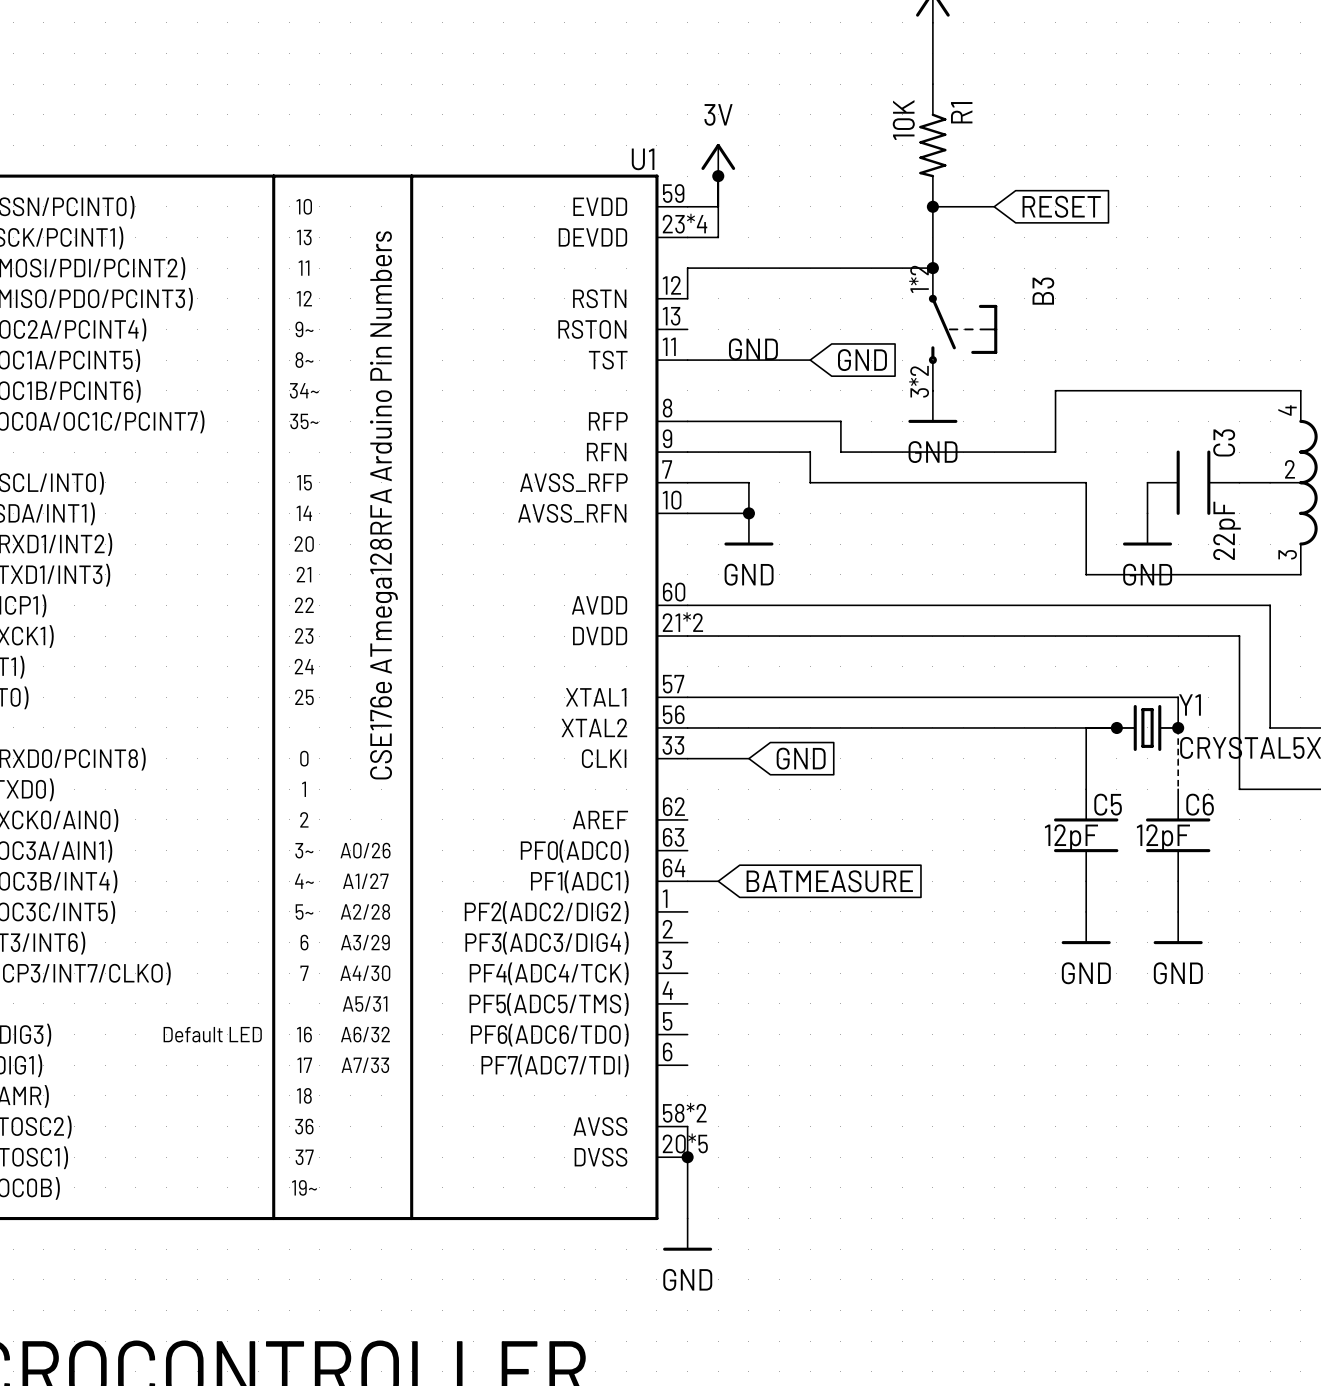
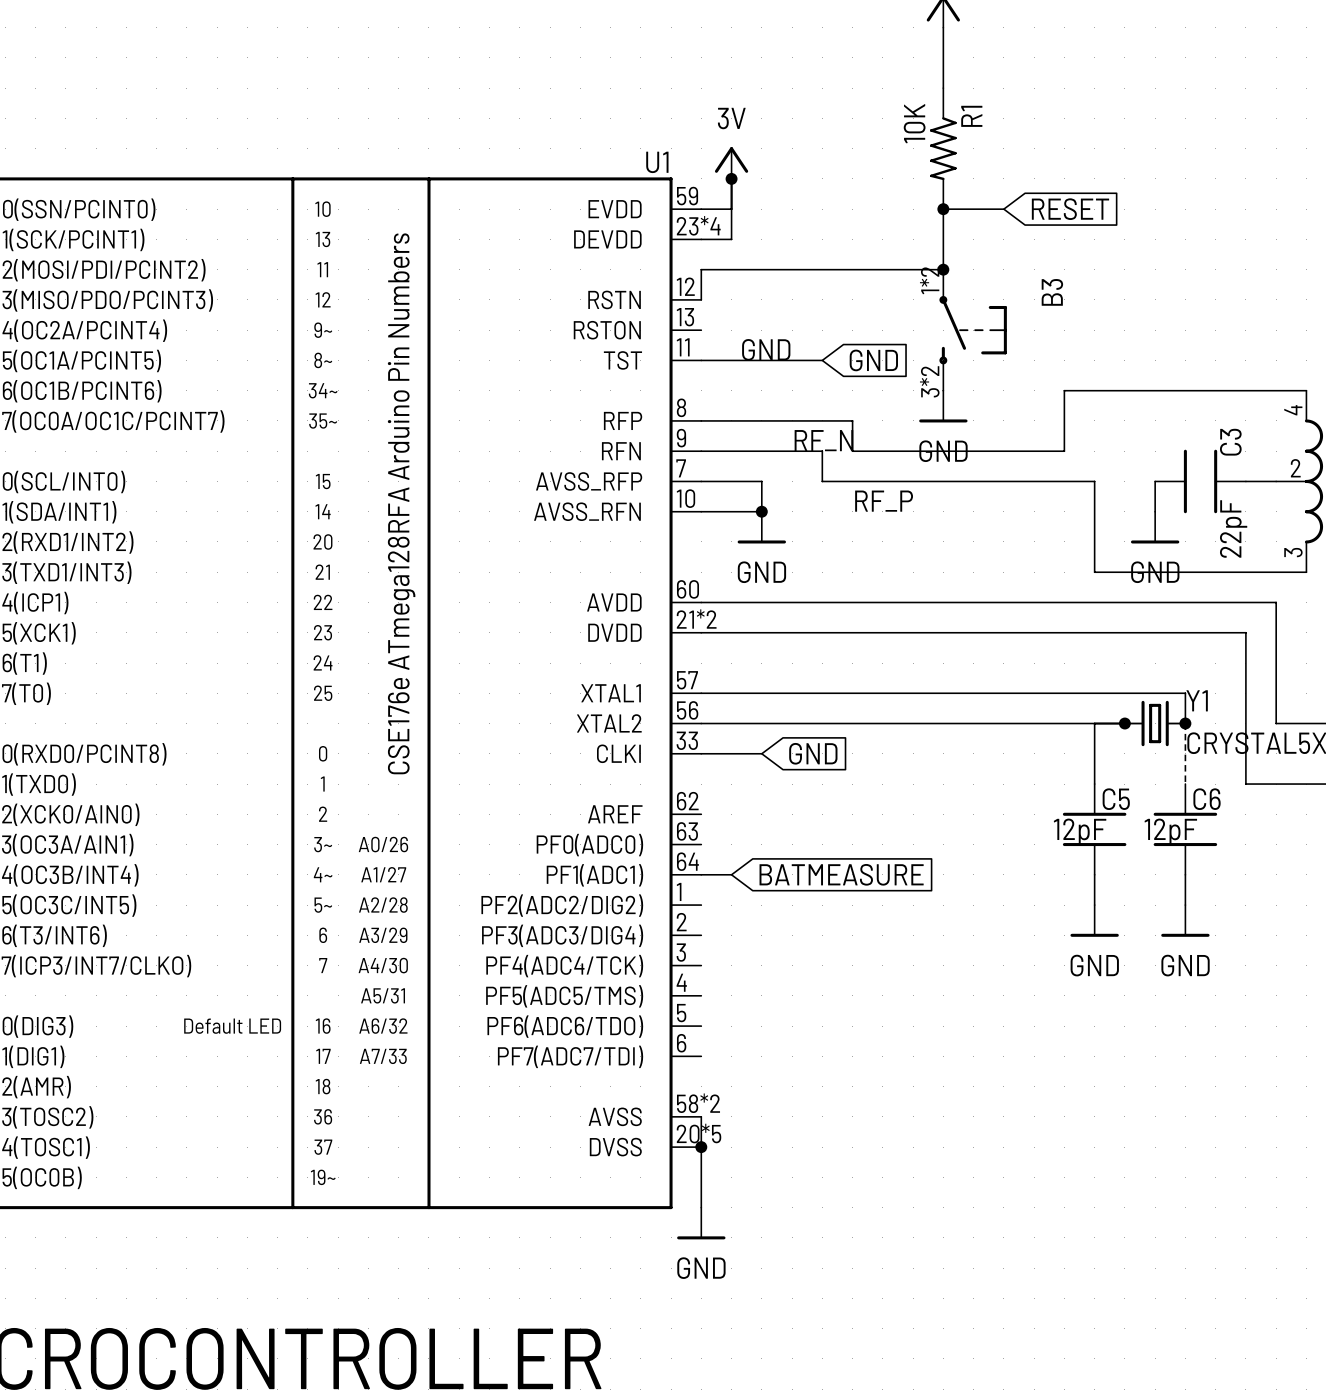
label: none -> RF_N (823, 440)
label: none -> RF_P (884, 501)

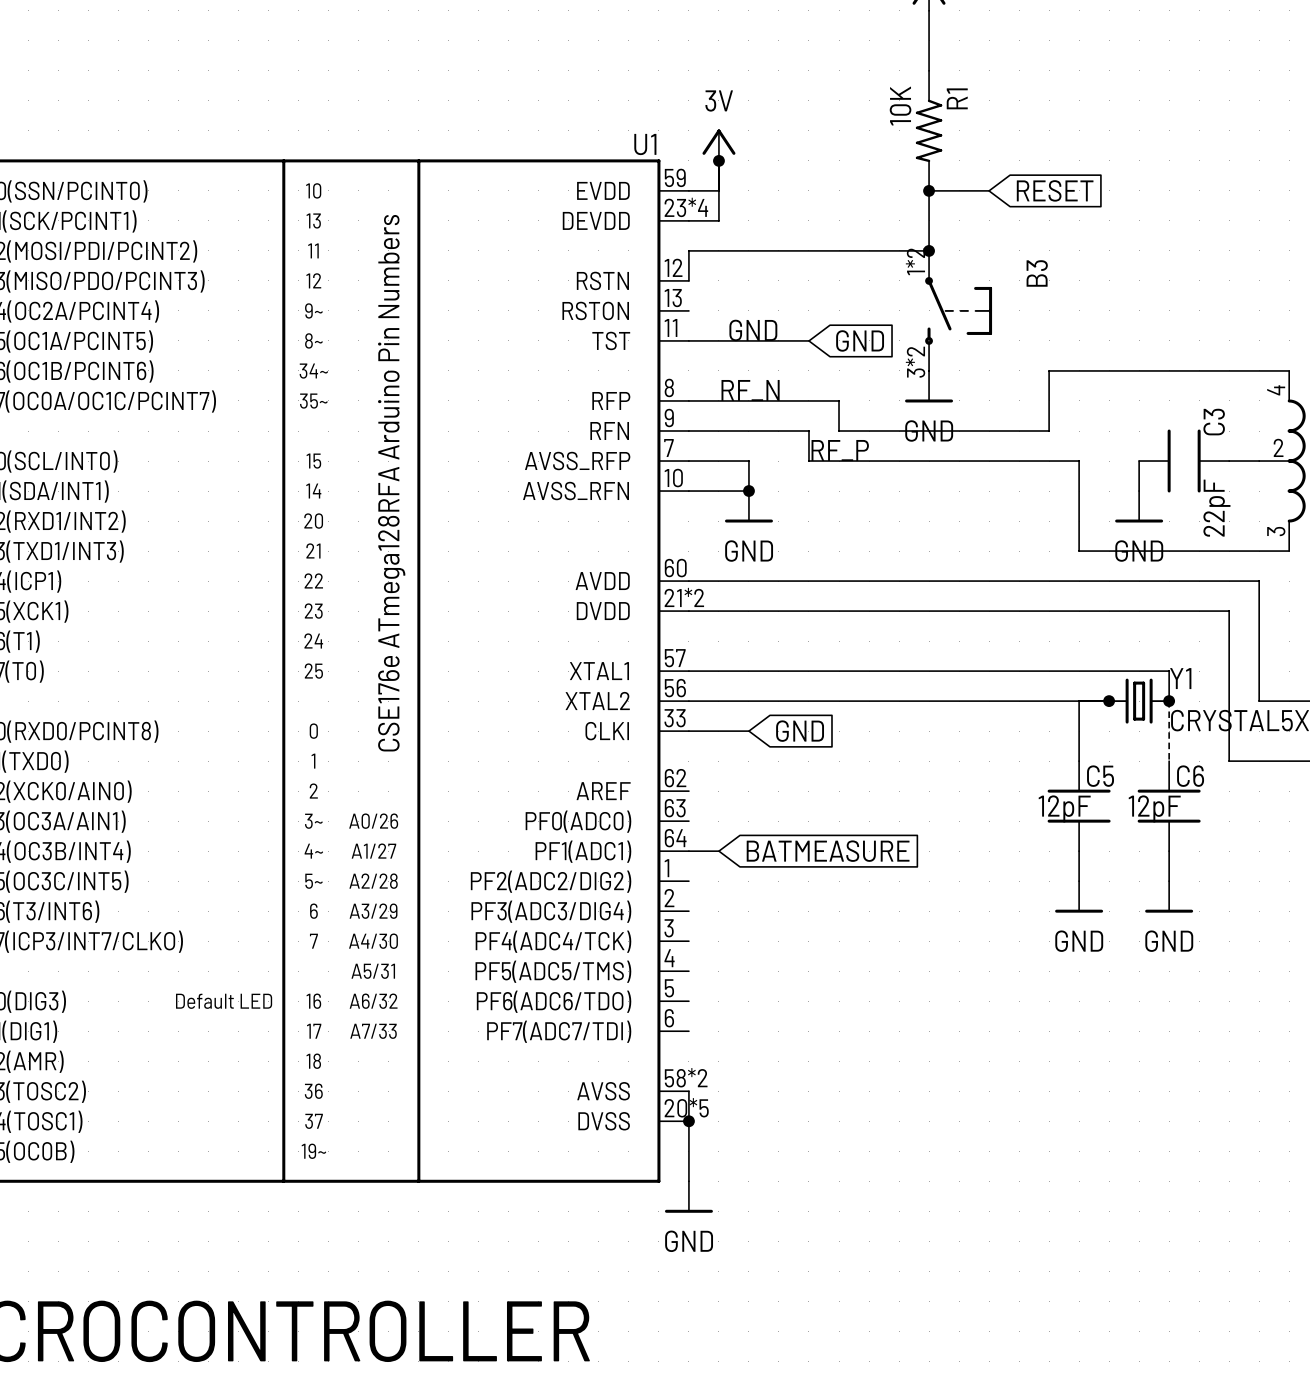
label position: RF_N (823, 440) -> RF_N (750, 390)
label position: RF_P (884, 501) -> RF_P (840, 450)

